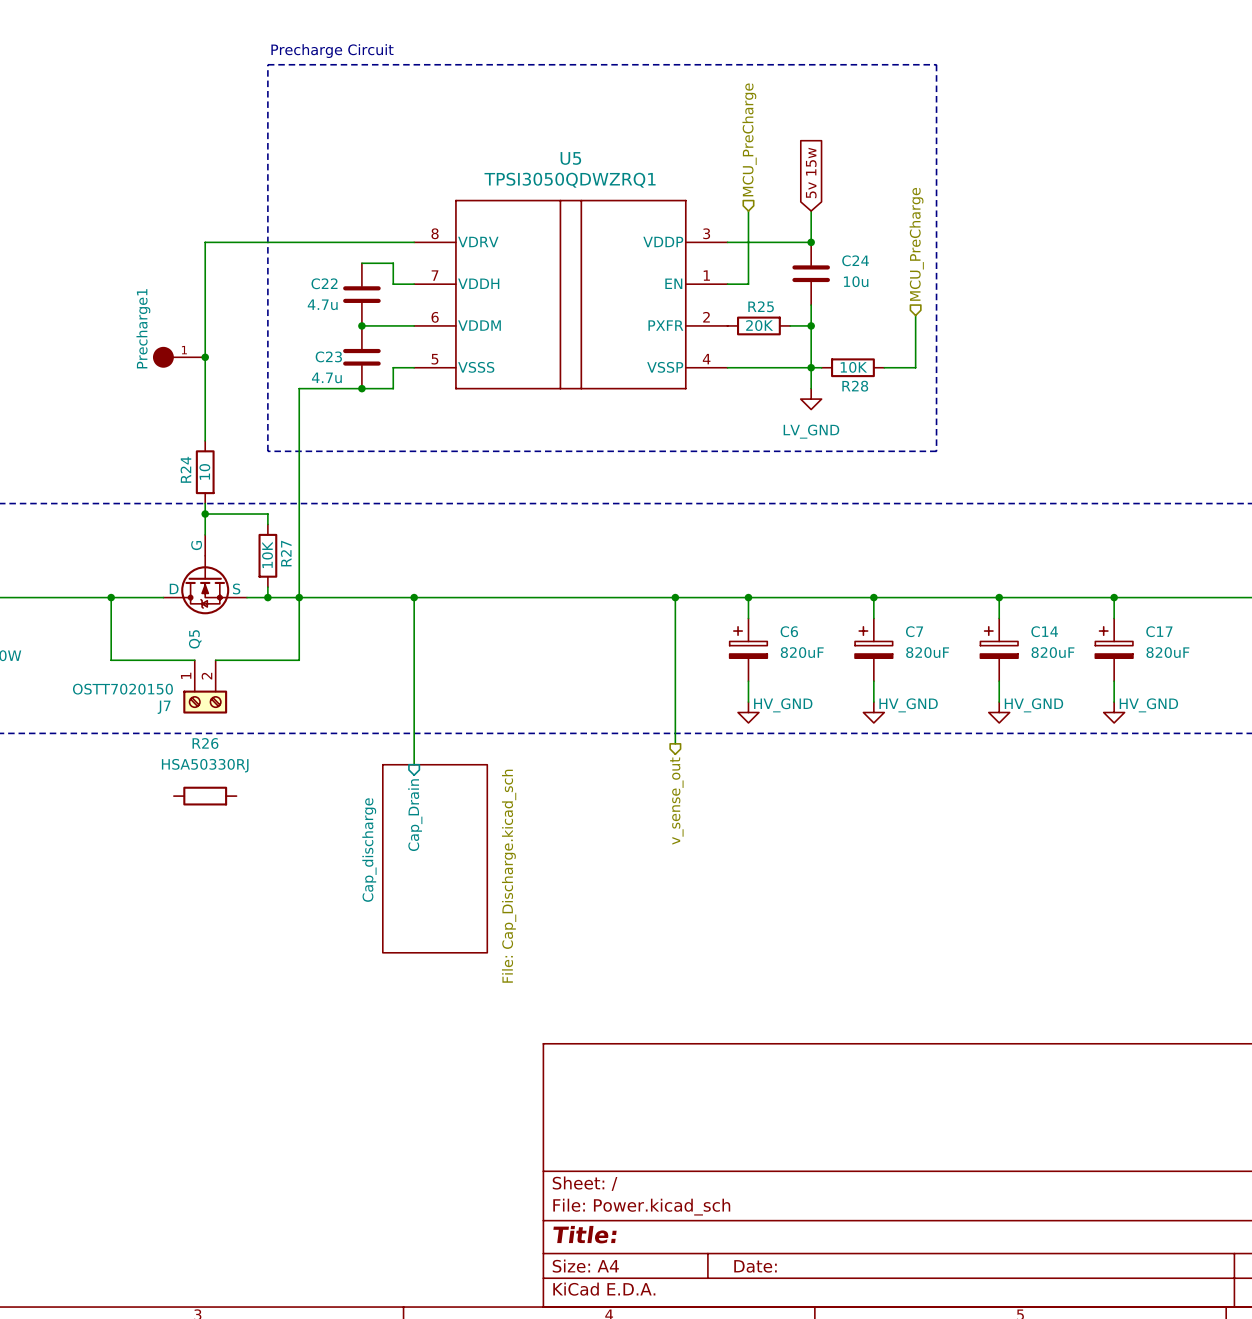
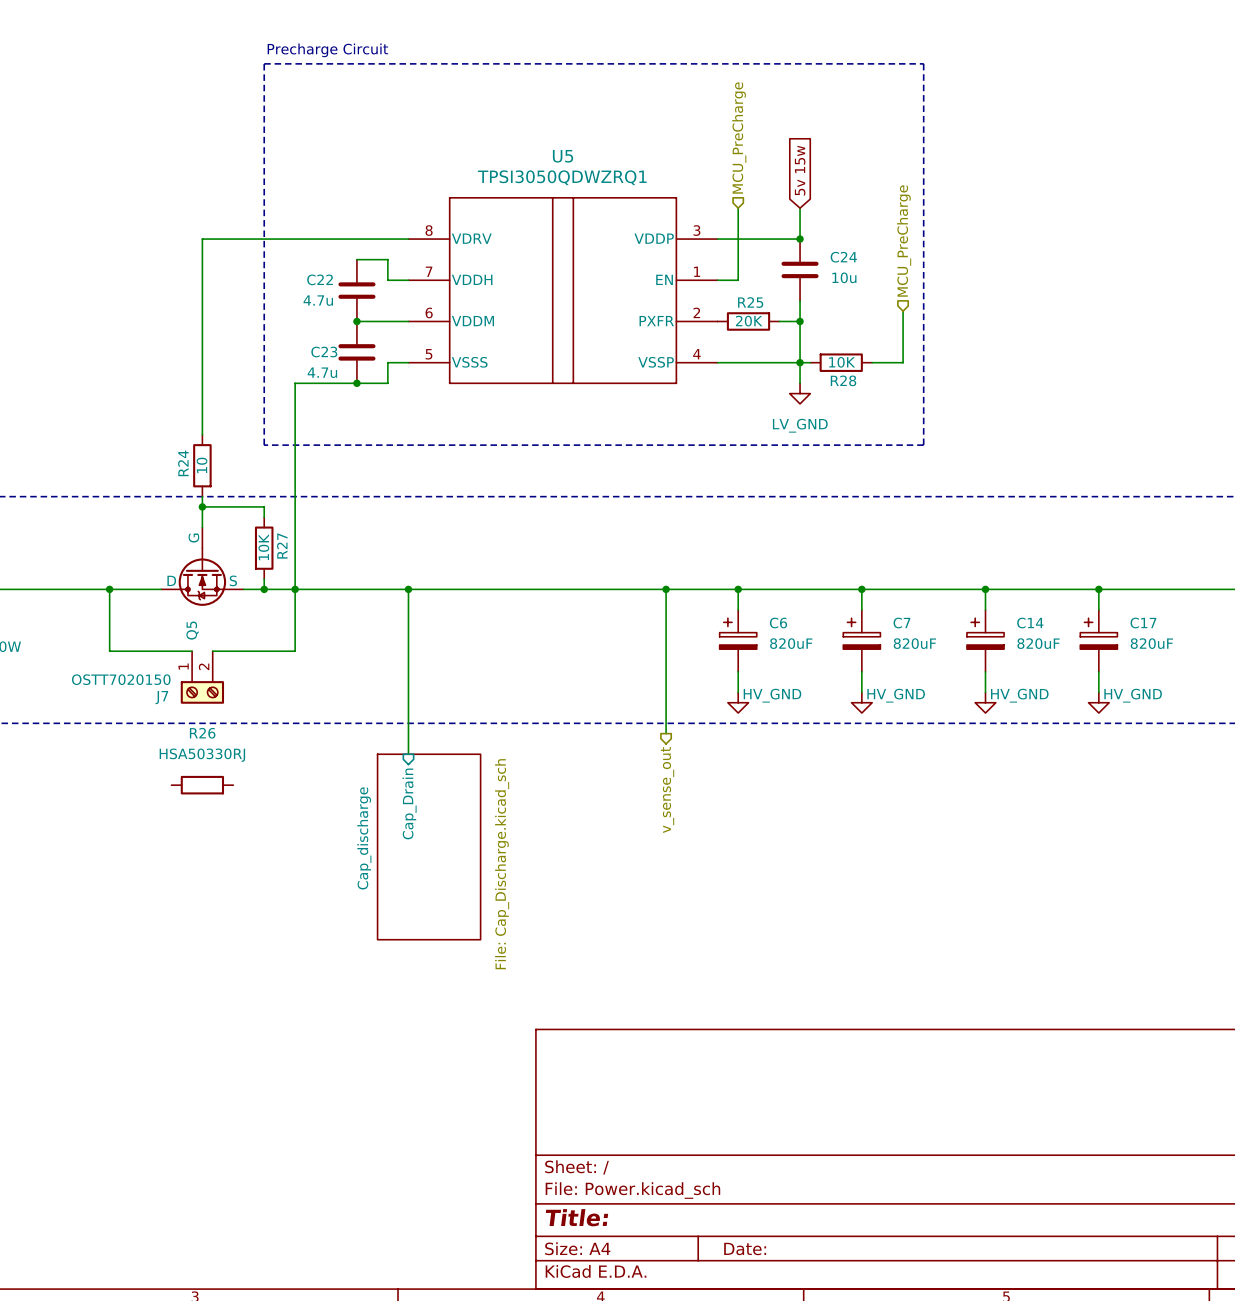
Precharge1: (179, 357) -> none
junction: (205, 357) -> none

